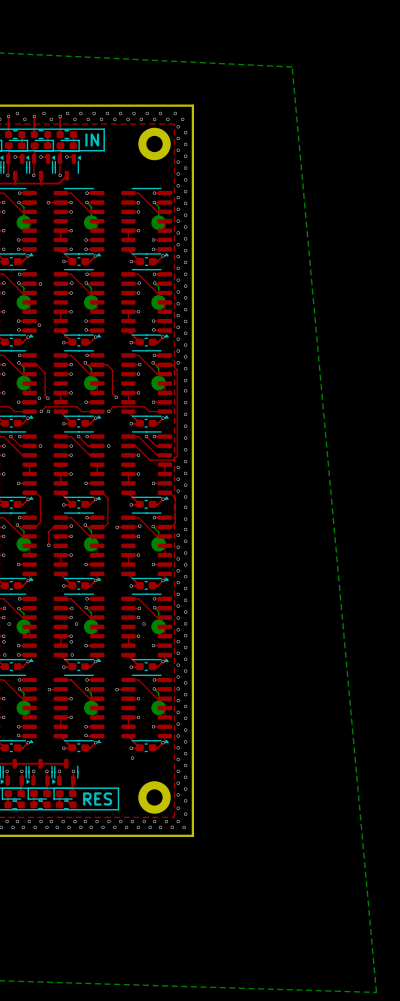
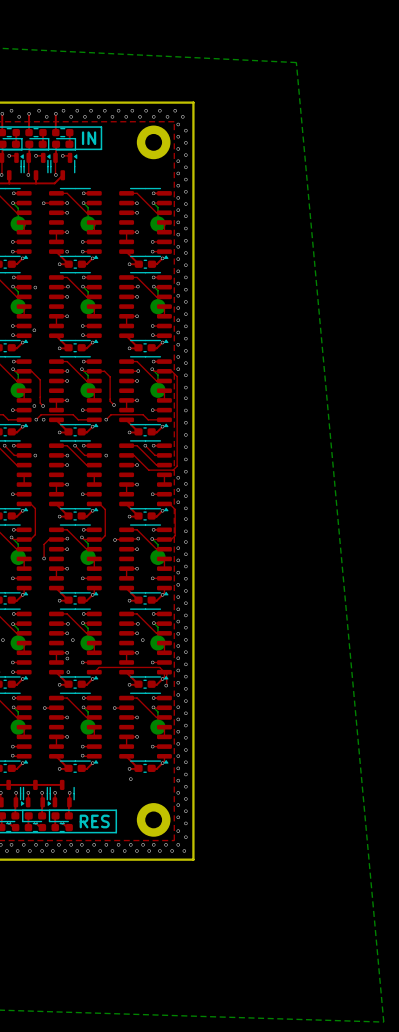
top track: (97, 655) (95, 661) -> (94, 672) (99, 667) (159, 667) (166, 674) (166, 685)
via: none -> (166, 685)

